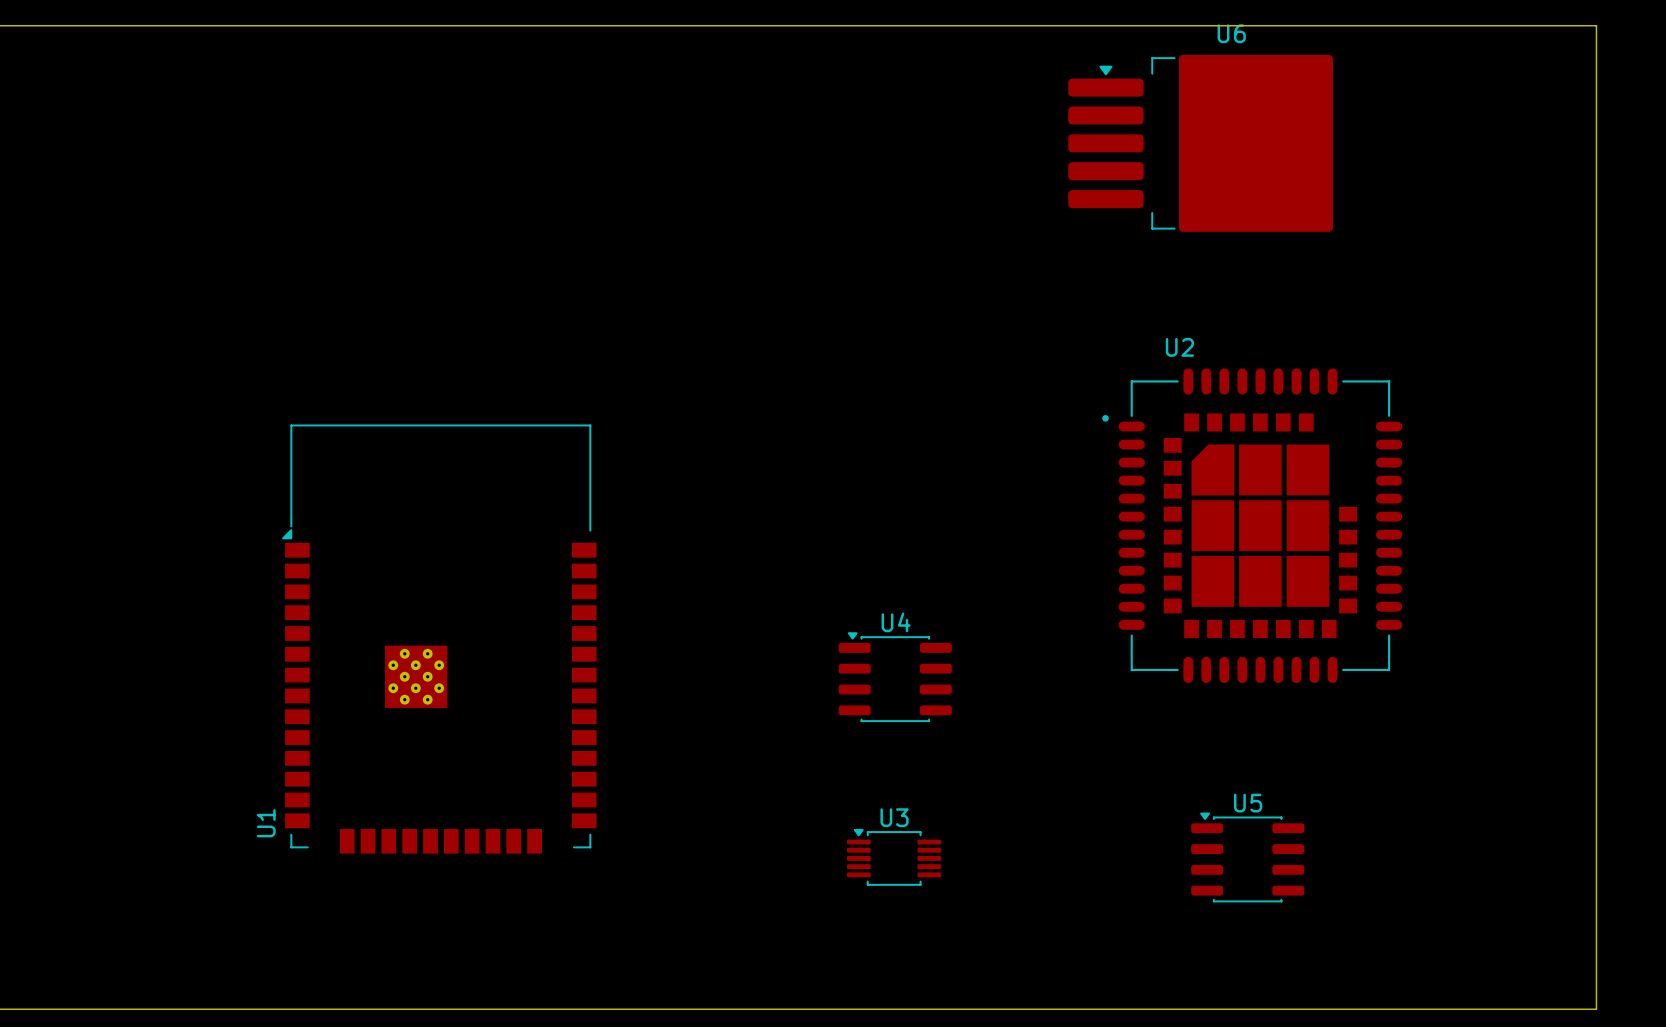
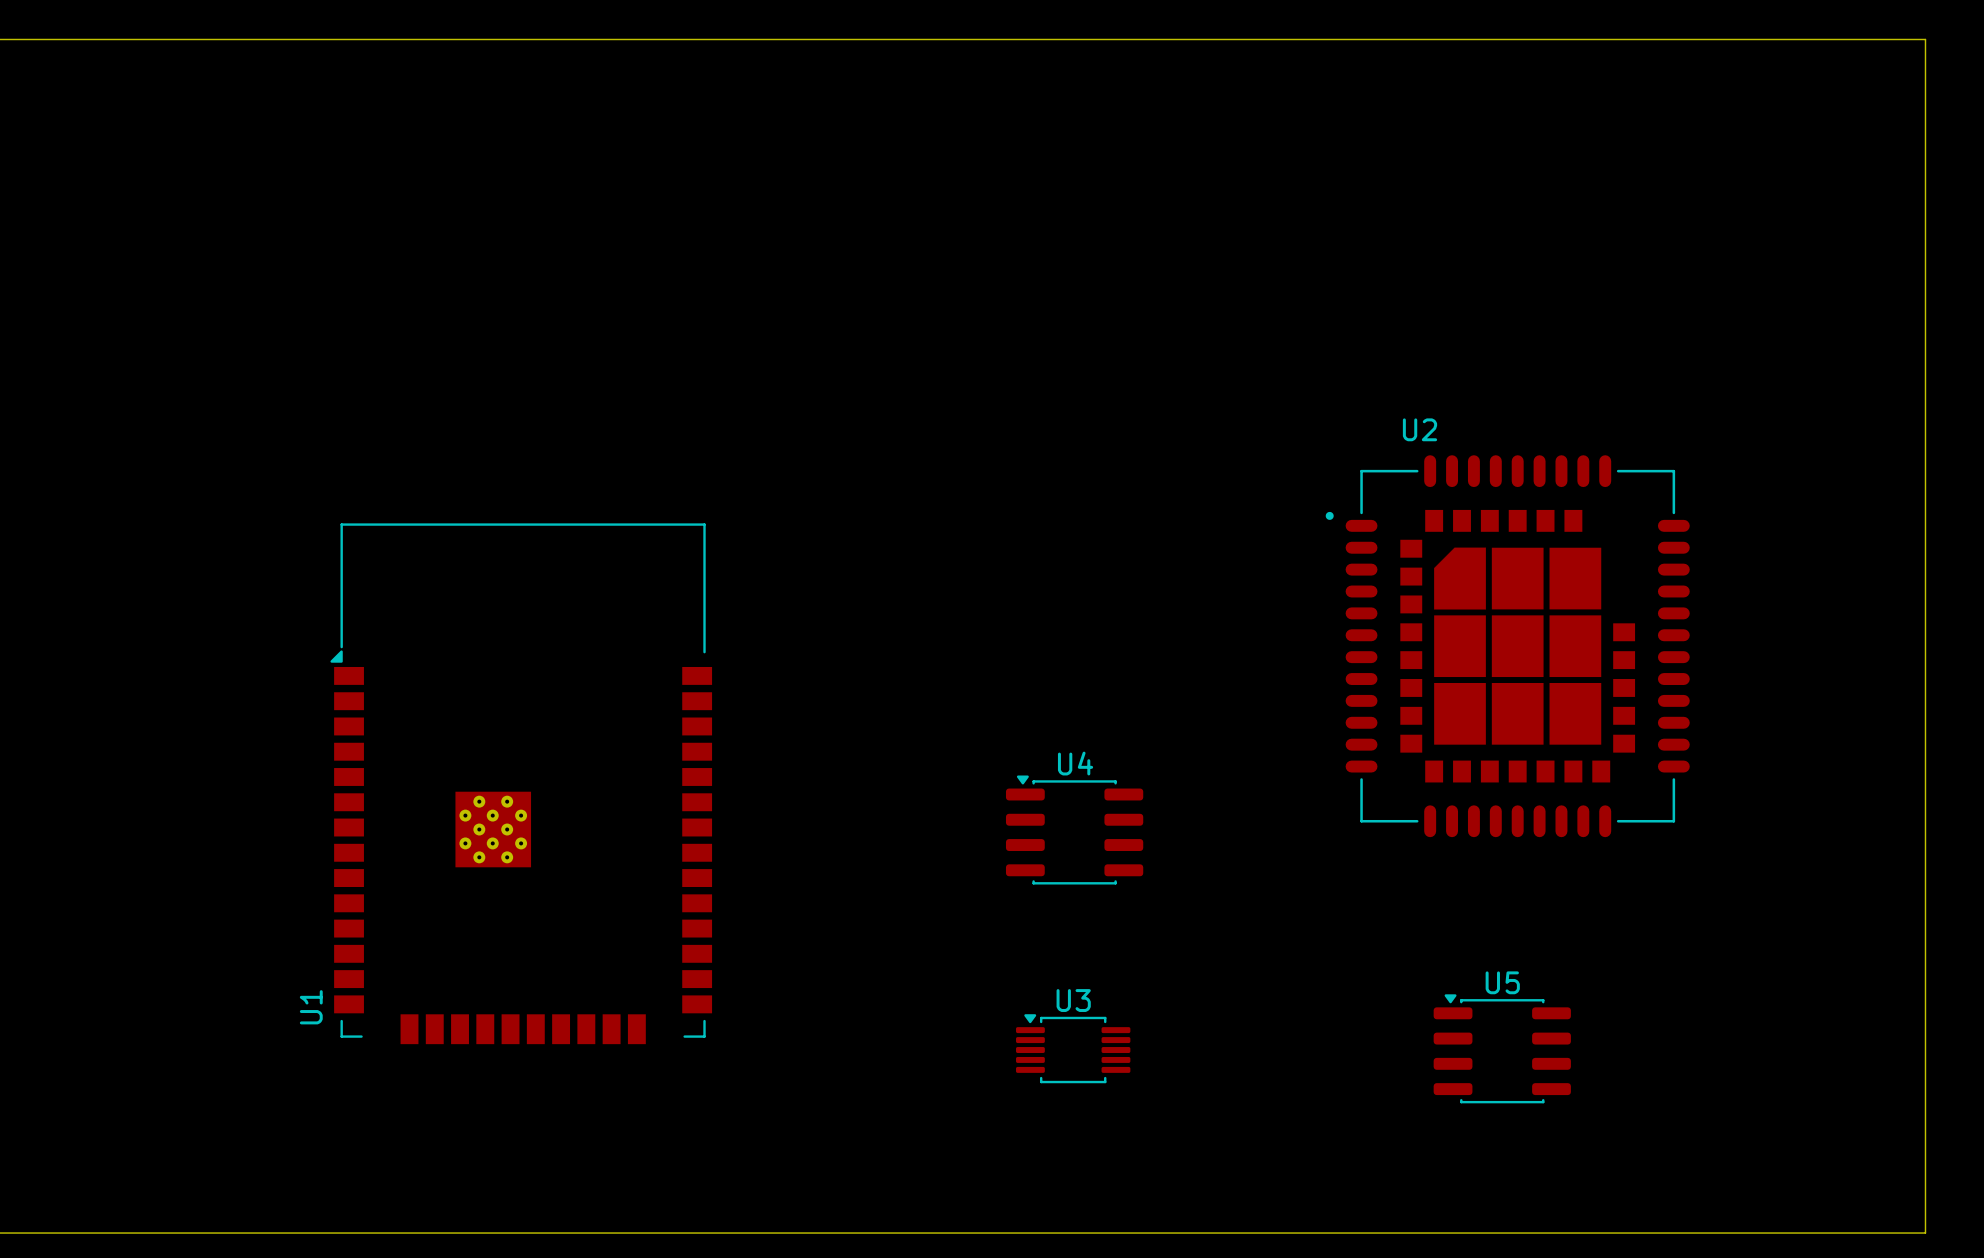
U6: (1200, 143) -> none

